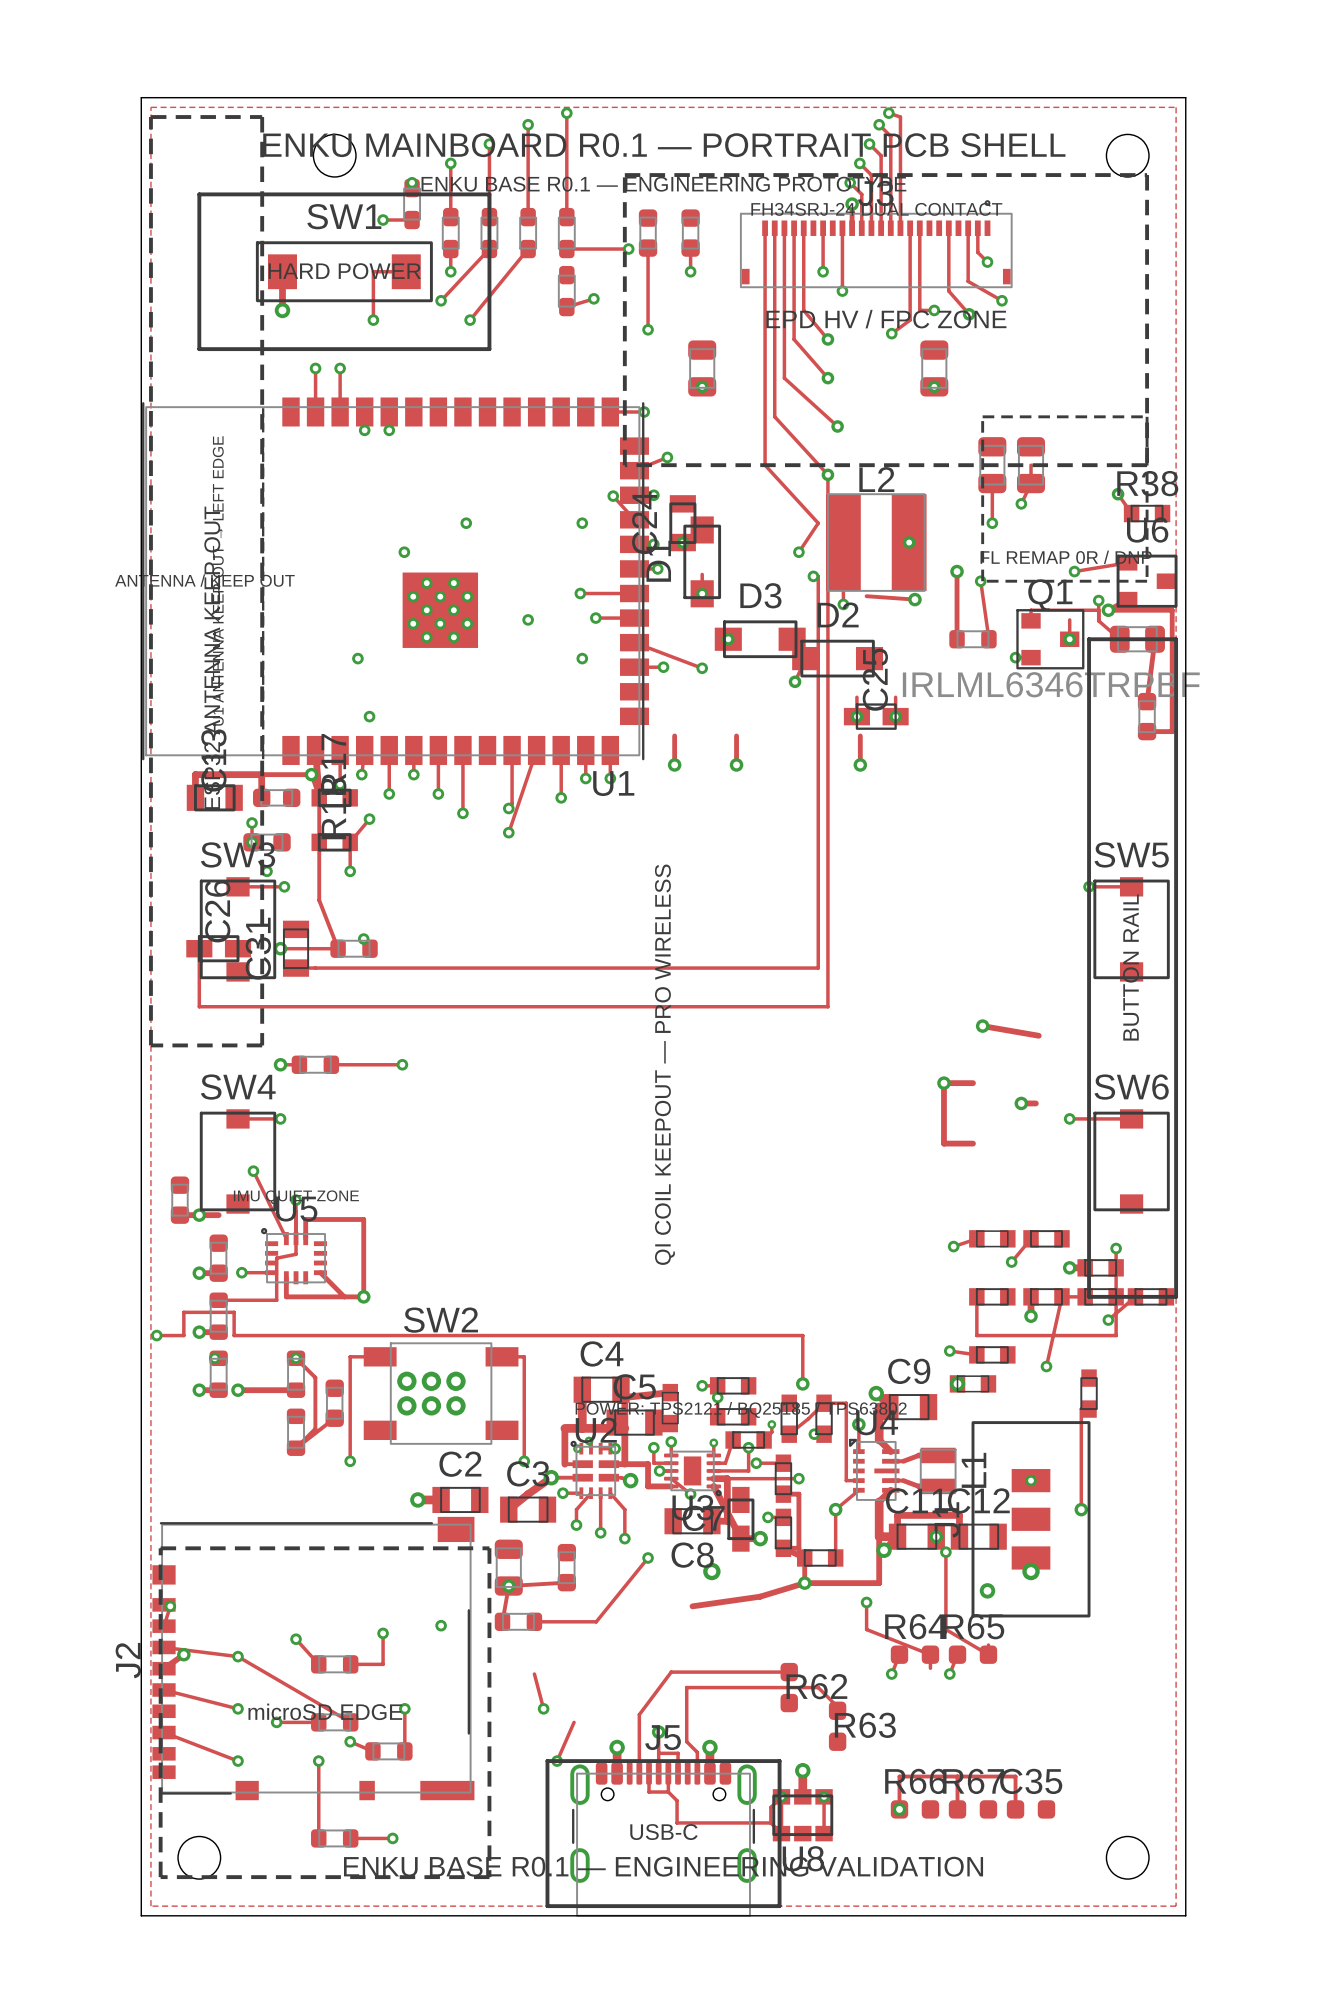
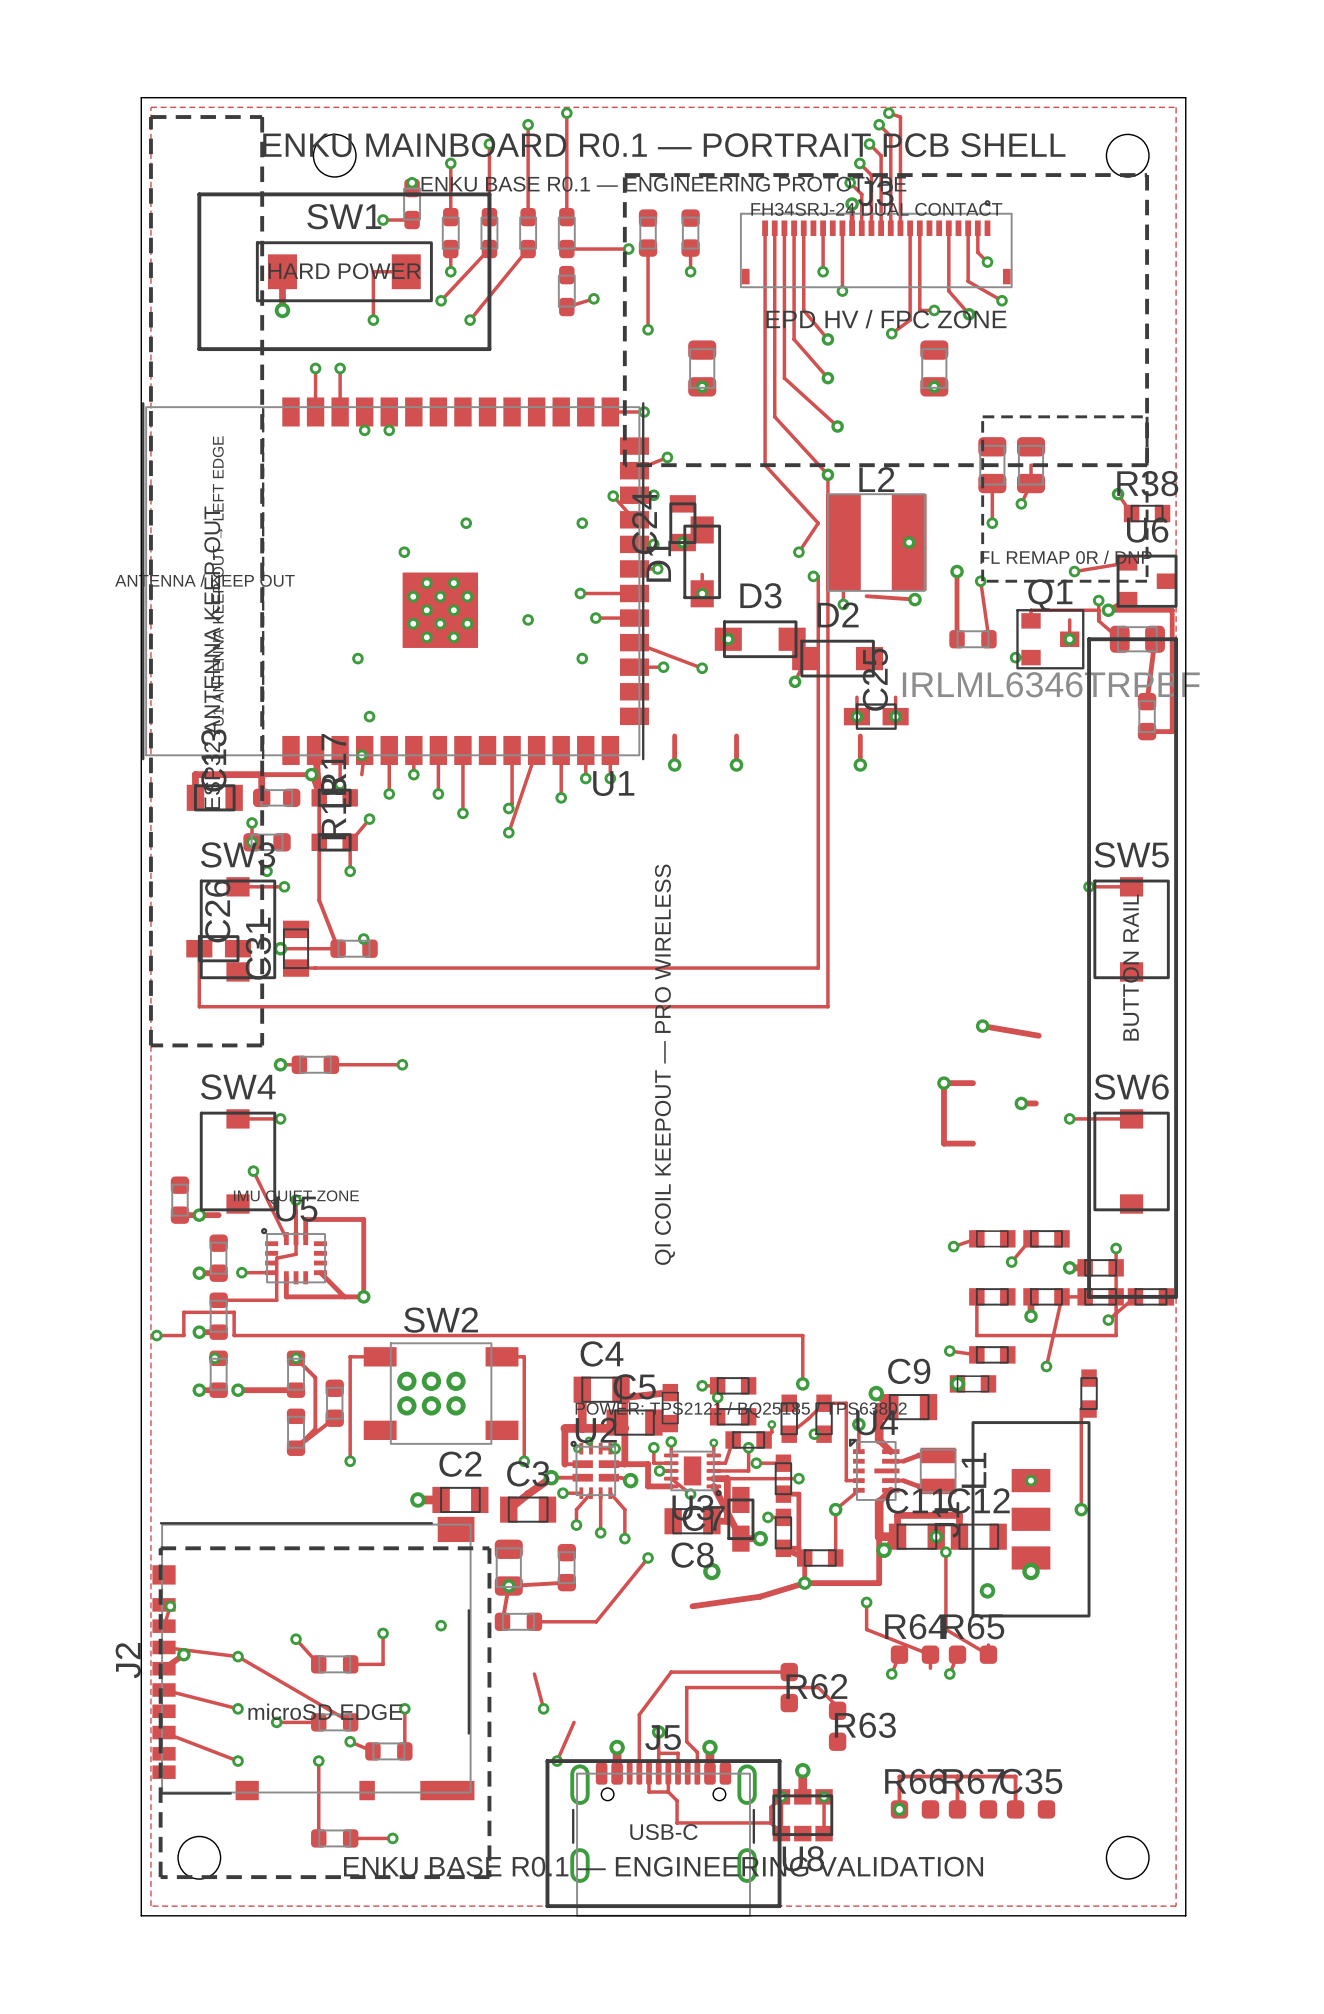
via position: (361, 774) -> (361, 755)

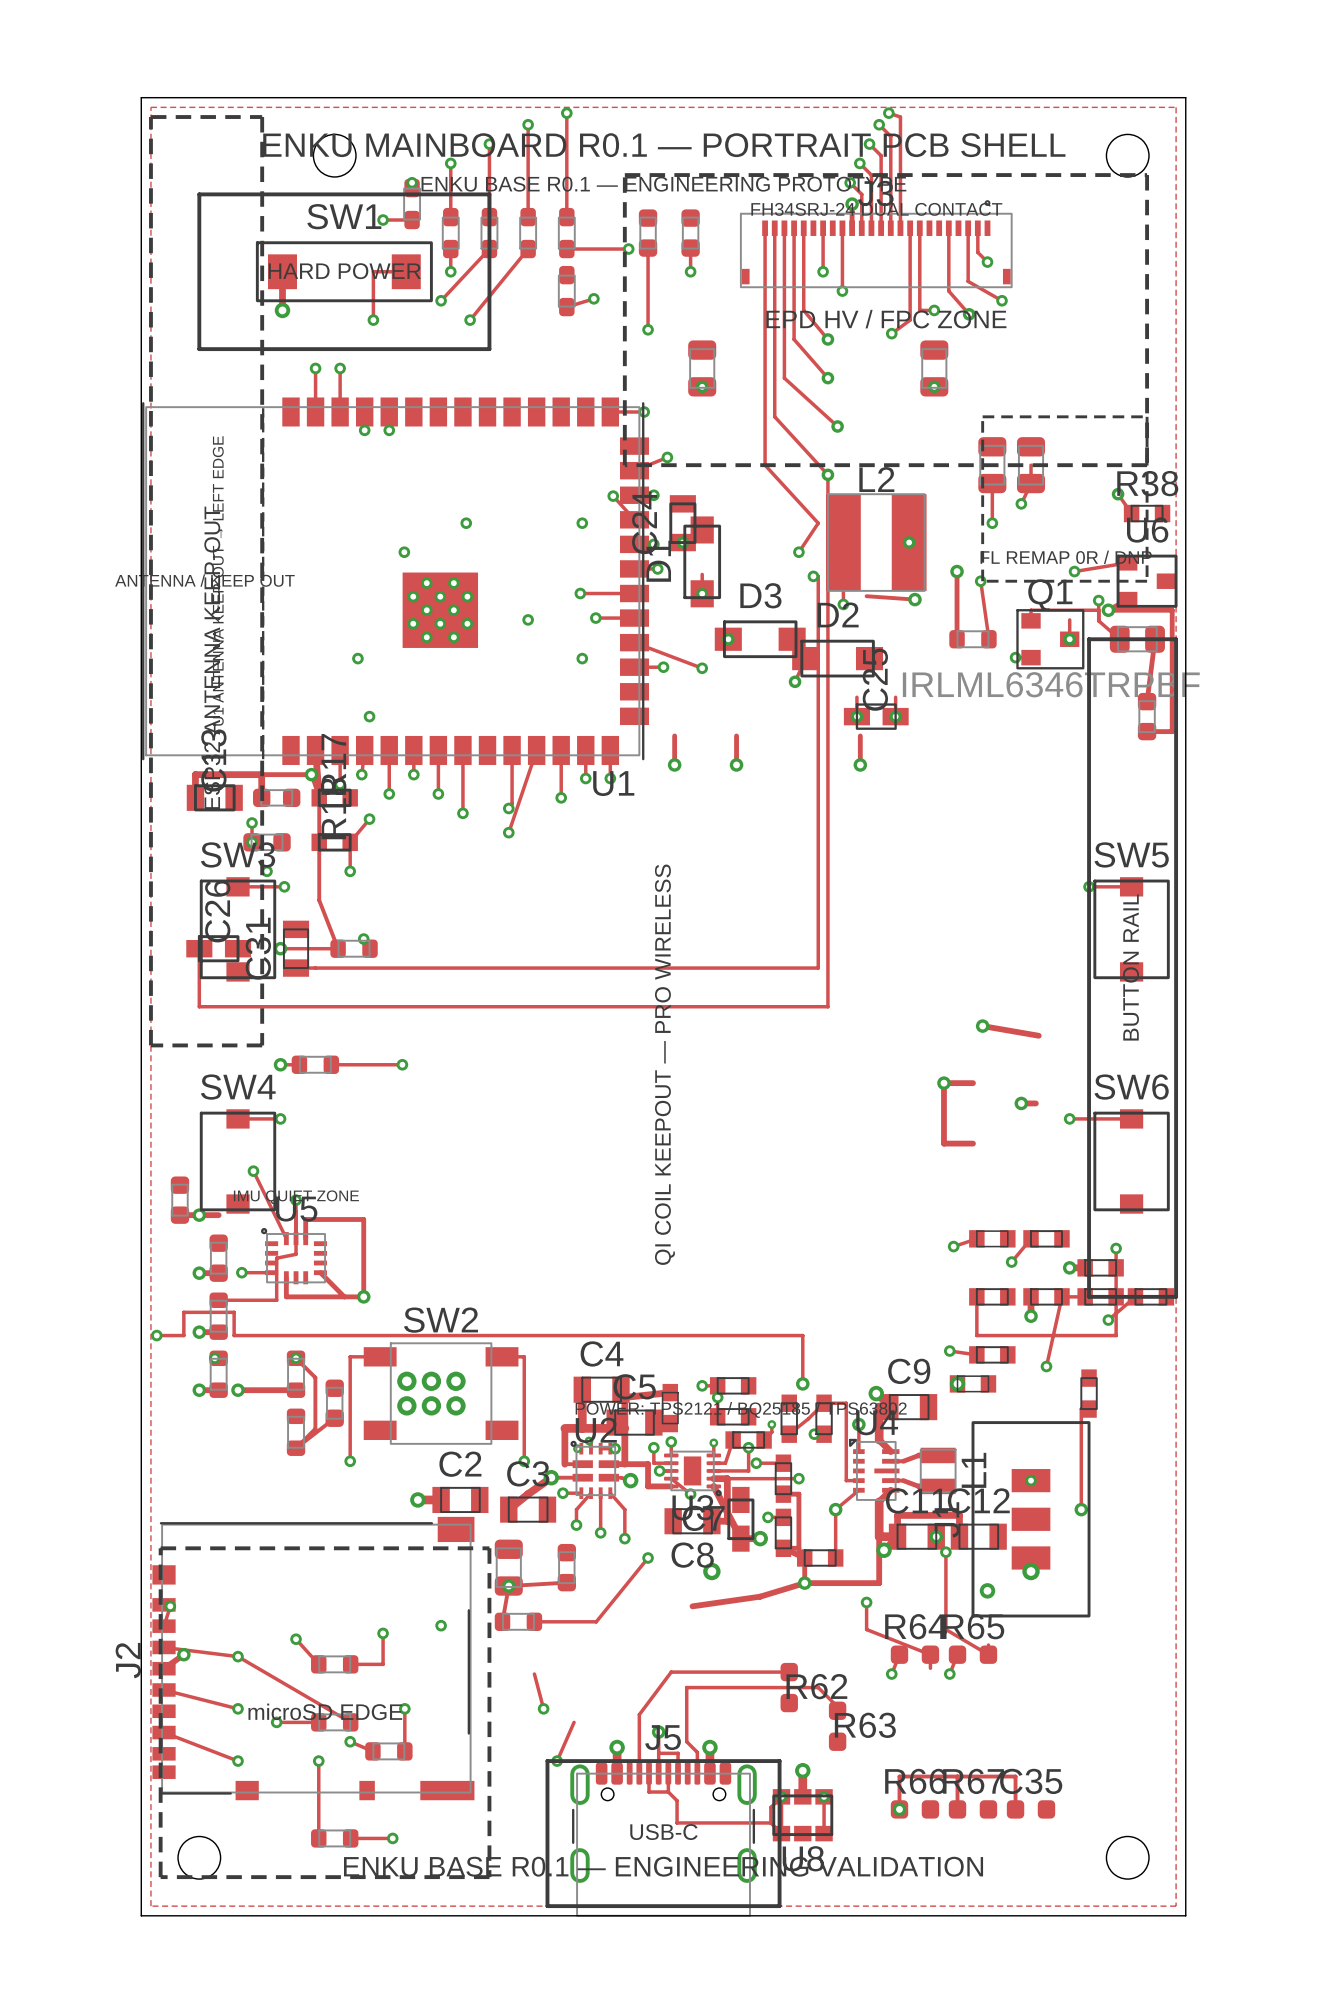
via position: (361, 755) -> (361, 774)

